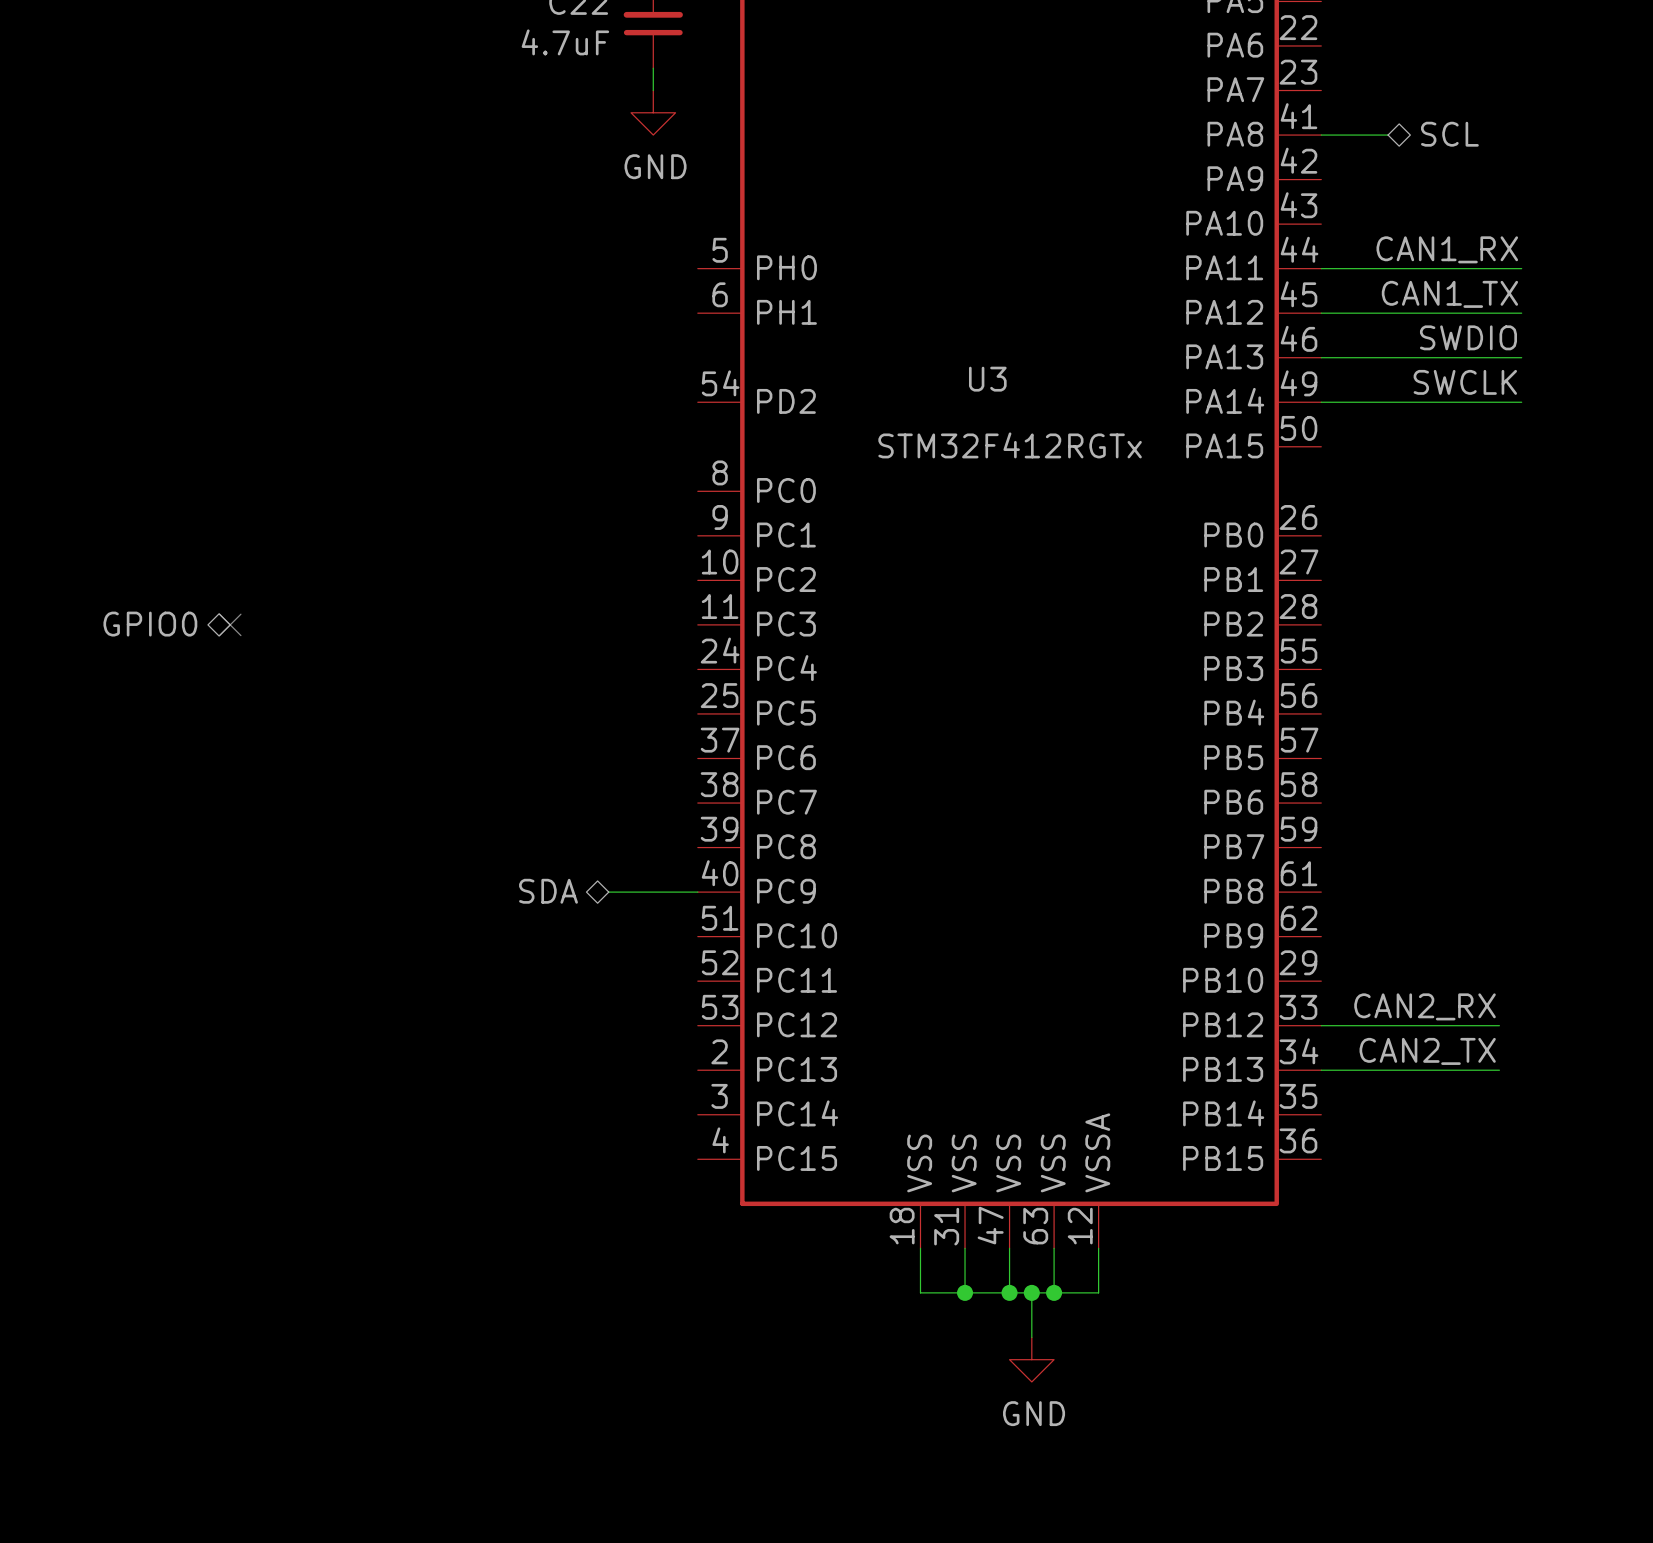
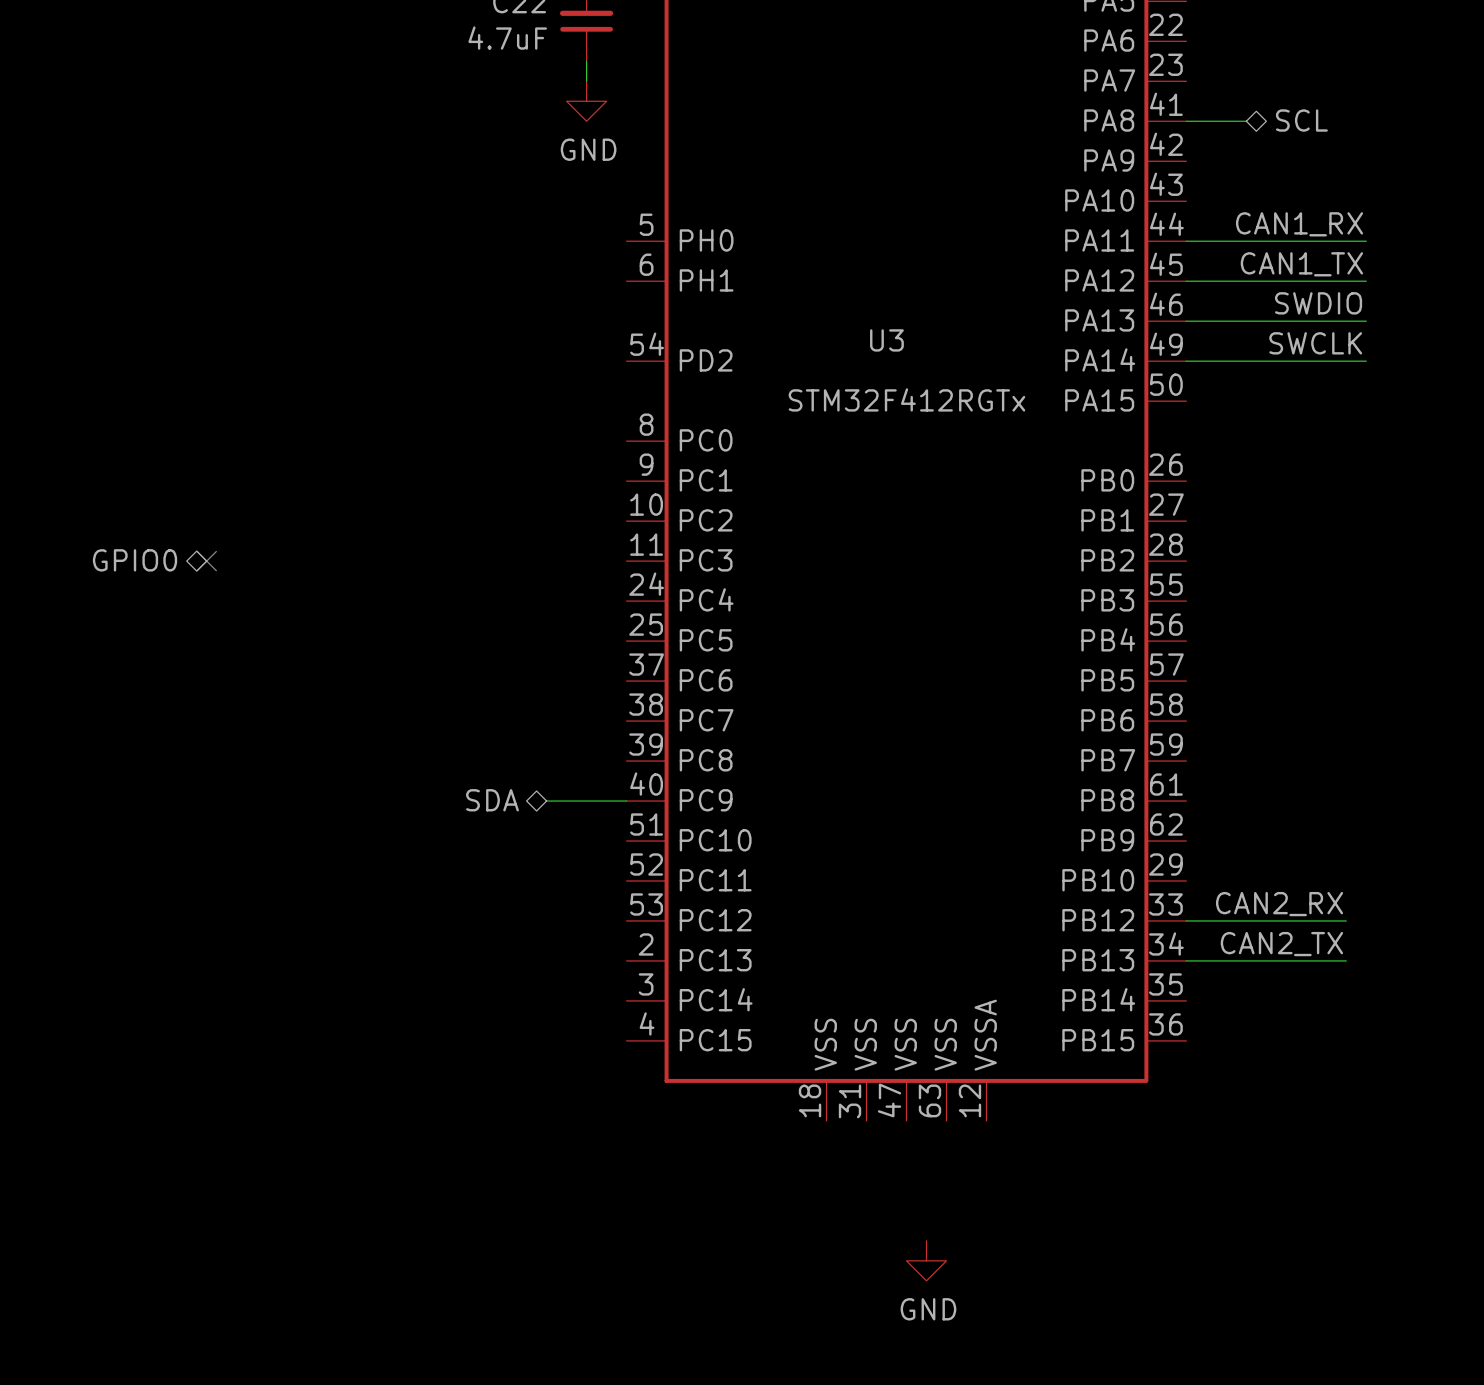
wire: (920, 1248) (920, 1292) (1098, 1292) (1098, 1248) -> none
wire: (965, 1248) (965, 1292) -> none
wire: (1009, 1248) (1009, 1292) -> none
wire: (1054, 1248) (1054, 1292) -> none
junction: (965, 1292) -> none
junction: (1009, 1292) -> none
wire: (1031, 1292) (1031, 1337) -> none
junction: (1031, 1292) -> none
junction: (1054, 1292) -> none
power symbol position: GND (1031, 1359) -> GND (926, 1260)

